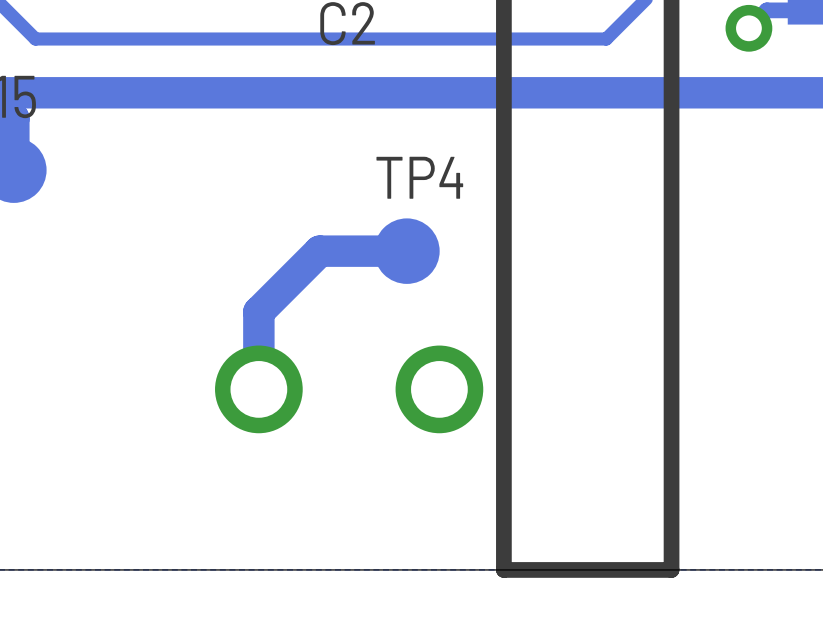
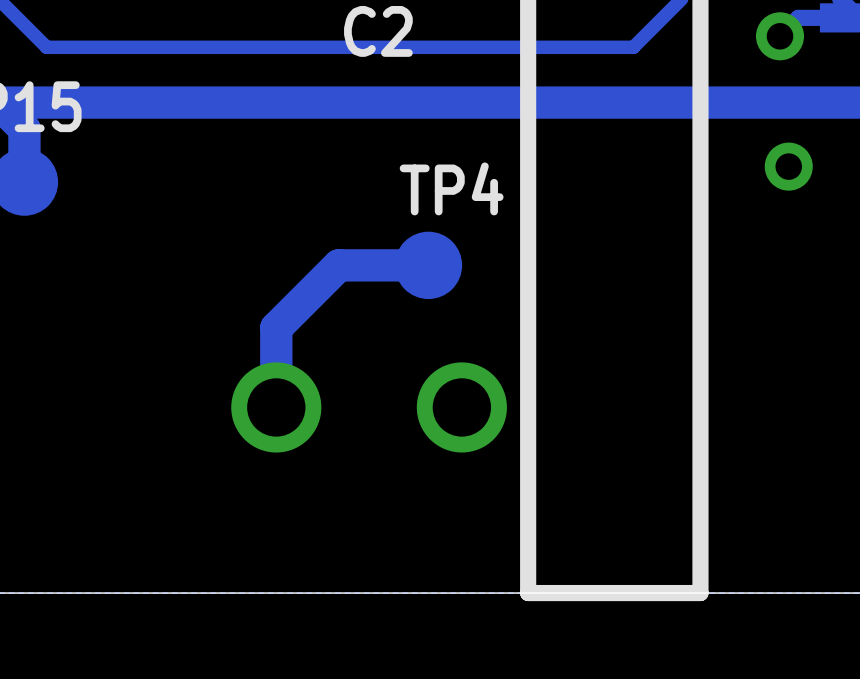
via: none -> (788, 166)

